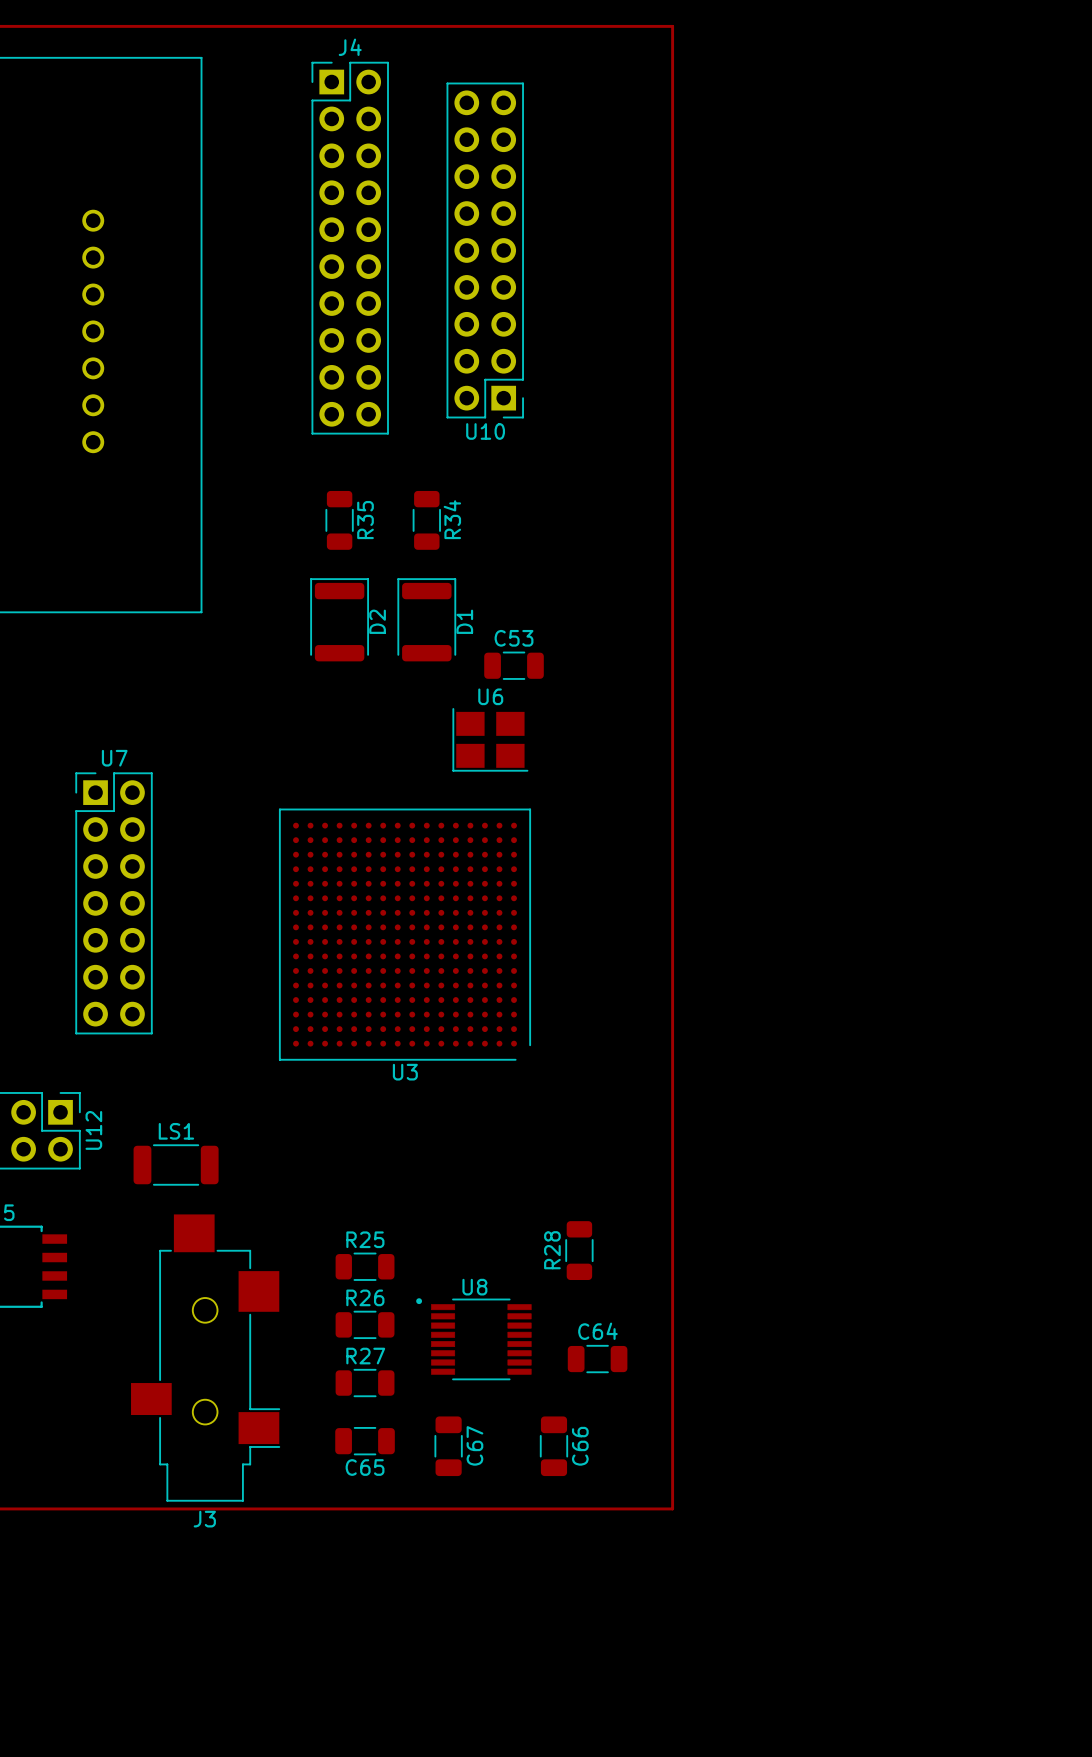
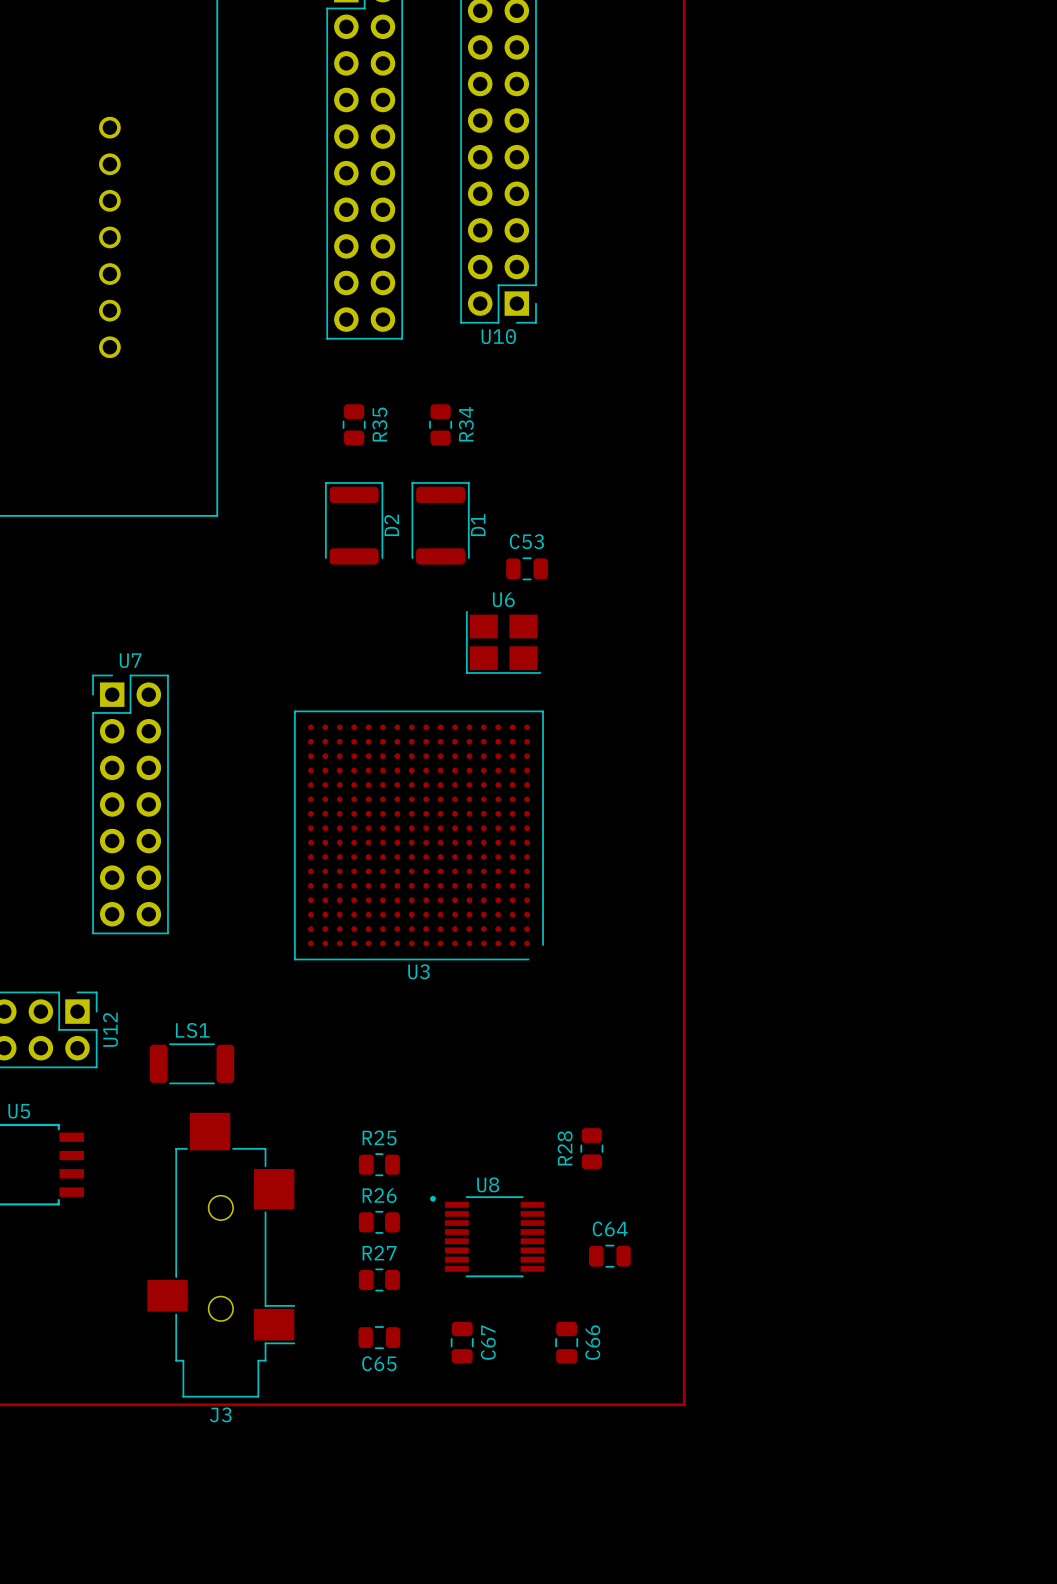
R35 footprint: [325, 490, 354, 550] -> [342, 404, 366, 446]
R34 footprint: [412, 490, 441, 550] -> [429, 404, 453, 446]
C53 footprint: [484, 651, 544, 680] -> [506, 557, 548, 581]
R28 footprint: [565, 1221, 594, 1281] -> [580, 1128, 604, 1170]
R25 footprint: [335, 1252, 395, 1281] -> [358, 1153, 400, 1177]
R26 footprint: [335, 1310, 395, 1339] -> [358, 1210, 400, 1234]
C64 footprint: [567, 1344, 628, 1374] -> [589, 1244, 631, 1268]
R27 footprint: [335, 1368, 395, 1398] -> [358, 1268, 400, 1292]
C67 footprint: [434, 1416, 463, 1477] -> [450, 1321, 474, 1364]
C66 footprint: [539, 1416, 569, 1477] -> [555, 1321, 579, 1364]
C65 footprint: [335, 1427, 395, 1456] -> [358, 1326, 401, 1350]

